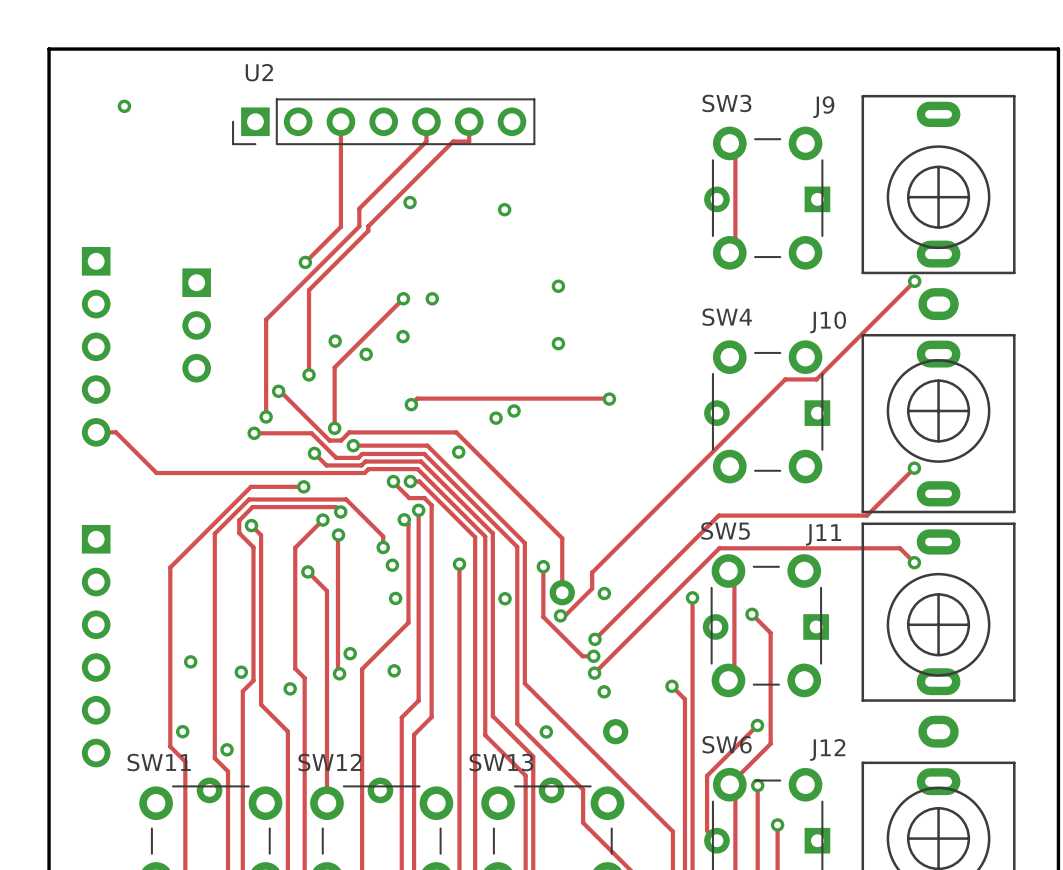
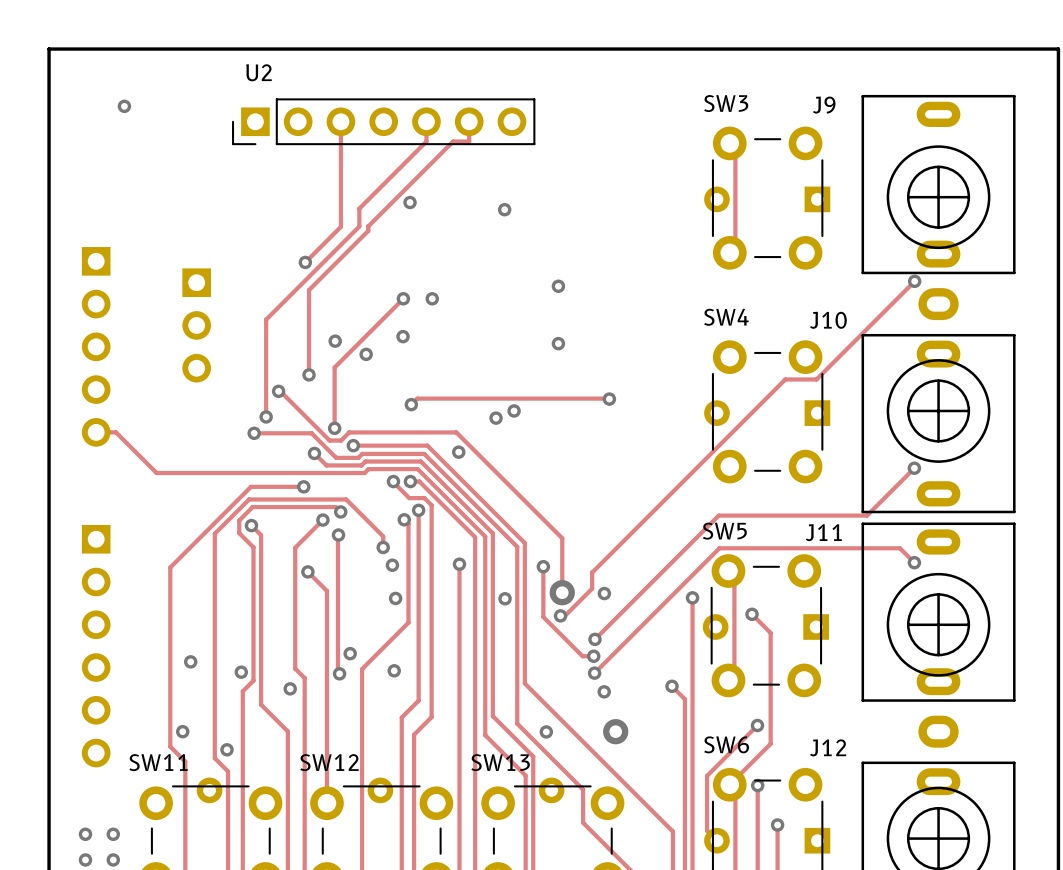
via: none -> (85, 834)
via: none -> (113, 834)
via: none -> (85, 859)
via: none -> (113, 859)

